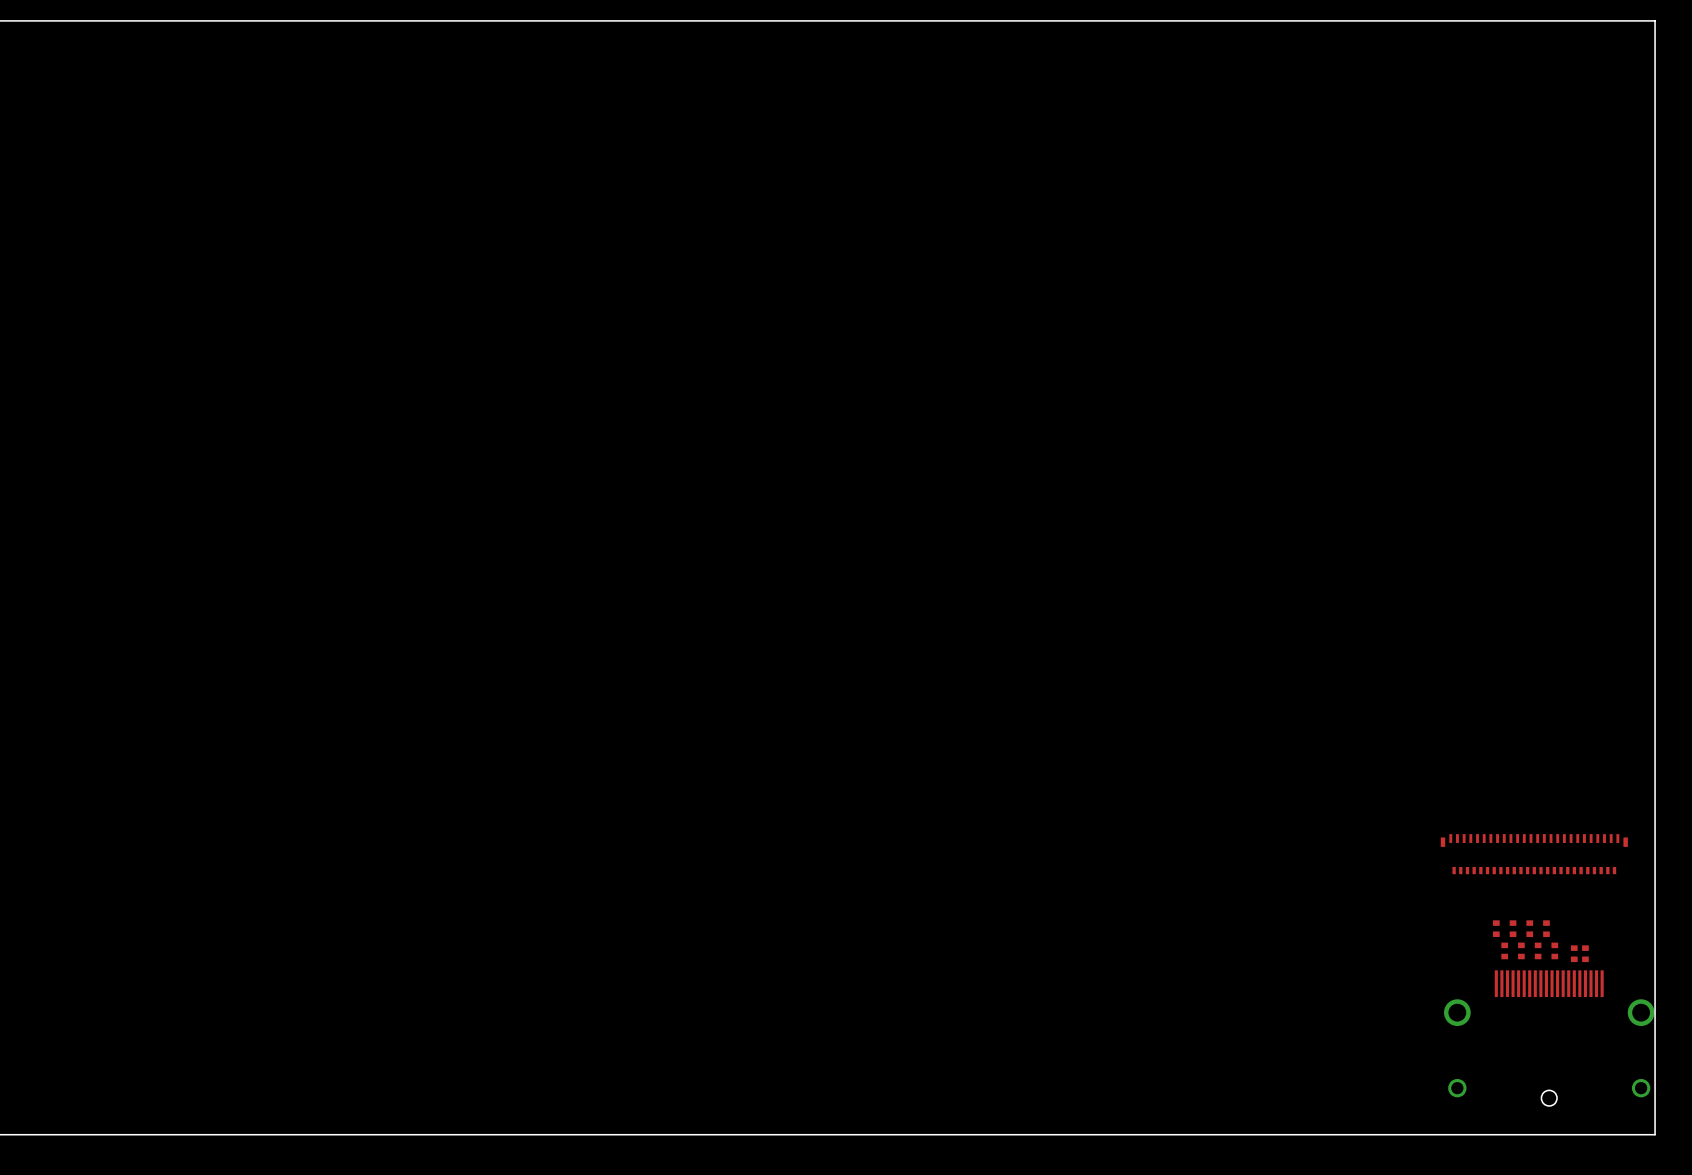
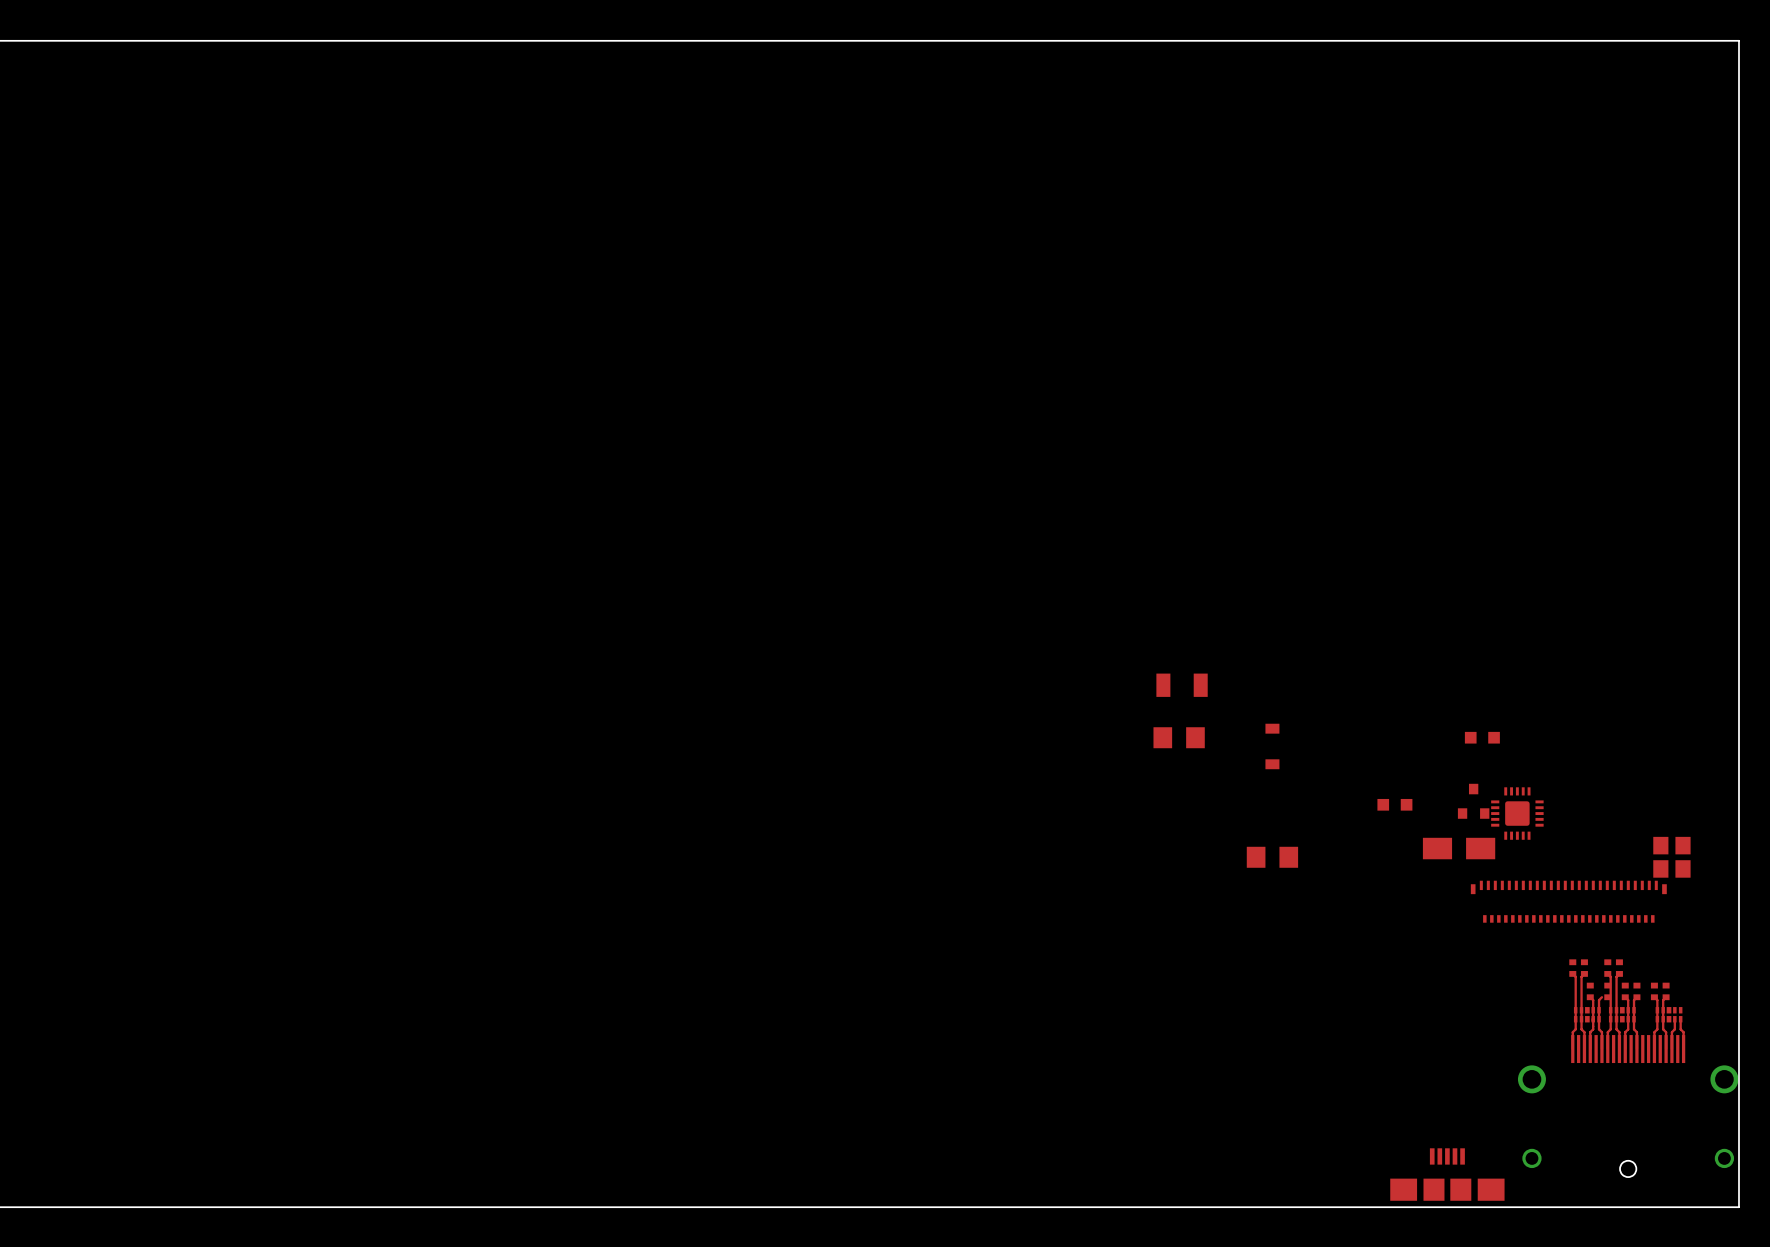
part: none -> (1182, 685)
part: none -> (1179, 737)
part: none -> (1482, 737)
part: none -> (1272, 746)
part: none -> (1473, 801)
part: none -> (1394, 804)
part: none -> (1517, 813)
part: none -> (1671, 845)
part: none -> (1459, 848)
part: none -> (1272, 857)
part: none -> (1671, 868)
part position: (1534, 854) -> (1568, 901)
part: none -> (1572, 968)
part: none -> (1584, 968)
part: none -> (1607, 968)
part: none -> (1619, 968)
top track: none -> (1572, 973) (1575, 976) (1575, 1029) (1572, 1032) (1572, 1049)
top track: none -> (1584, 973) (1581, 976) (1581, 1029) (1584, 1032) (1584, 1049)
top track: none -> (1607, 973) (1610, 976) (1610, 1029) (1607, 1032) (1607, 1049)
top track: none -> (1619, 973) (1616, 976) (1616, 1029) (1619, 1032) (1619, 1049)
part: (1496, 928) -> none
part: none -> (1636, 991)
part: none -> (1654, 991)
part: none -> (1666, 991)
top track: none -> (1590, 997) (1593, 1000) (1593, 1029) (1590, 1032) (1590, 1049)
top track: none -> (1601, 997) (1599, 1000) (1599, 1029) (1601, 1032) (1601, 1049)
top track: none -> (1625, 997) (1628, 1000) (1628, 1029) (1625, 1032) (1625, 1049)
top track: none -> (1636, 997) (1634, 1000) (1634, 1029) (1636, 1032) (1636, 1049)
top track: none -> (1654, 997) (1657, 1000) (1657, 1029) (1654, 1032) (1654, 1049)
top track: none -> (1666, 997) (1663, 1000) (1663, 1029) (1666, 1032) (1666, 1049)
part footprint: [1582, 945, 1589, 963] -> [1655, 1007, 1683, 1023]
part: (1504, 950) -> none
part: none -> (1587, 1014)
part: (1521, 950) -> none
part: (1538, 950) -> none
part: none -> (1622, 1014)
part: (1554, 950) -> none
part: (1574, 953) -> none
top track: none -> (1674, 1019) (1674, 1029) (1671, 1032) (1671, 1049)
top track: none -> (1680, 1019) (1680, 1029) (1683, 1032) (1683, 1049)
part: none -> (1447, 1174)

